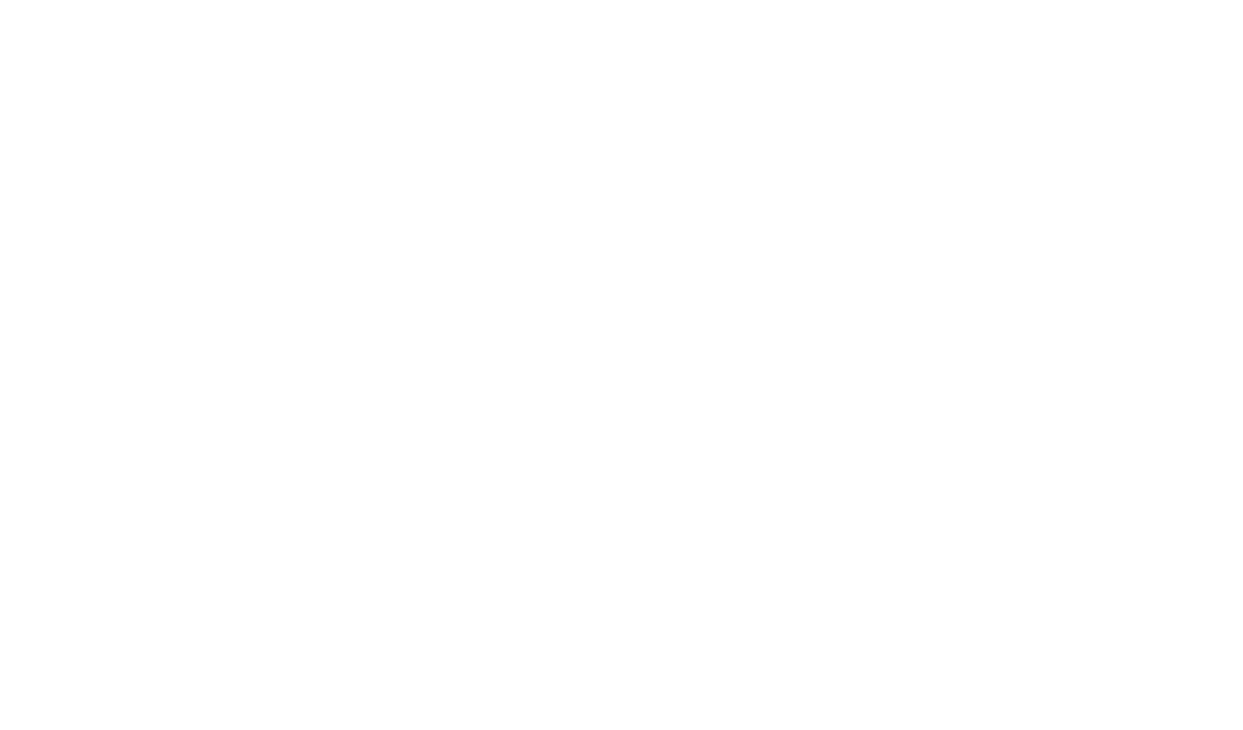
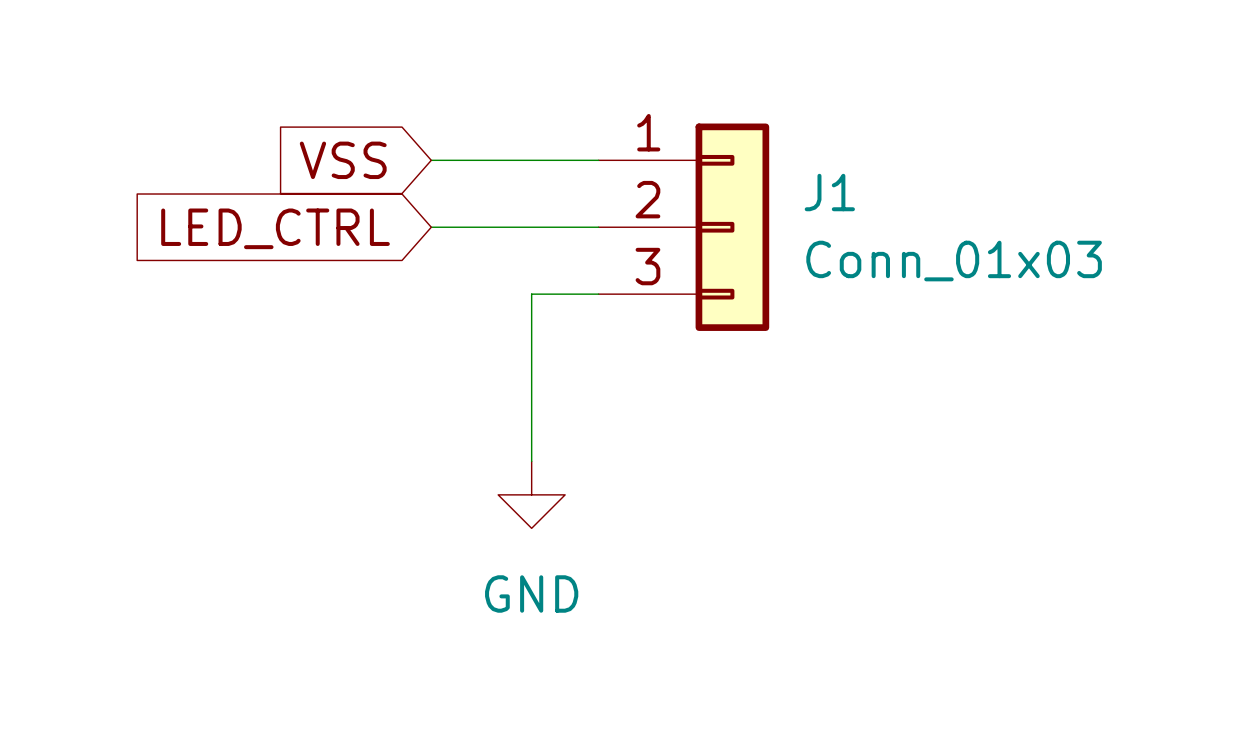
global label: none -> VSS (343, 160)
wire: none -> (431, 160) (598, 160)
wire: none -> (431, 227) (598, 227)
J1: none -> Conn_01x03 (683, 227)
global label: none -> LED_CTRL (275, 228)
wire: none -> (598, 294) (531, 294) (531, 461)
power symbol: none -> GND (531, 494)

